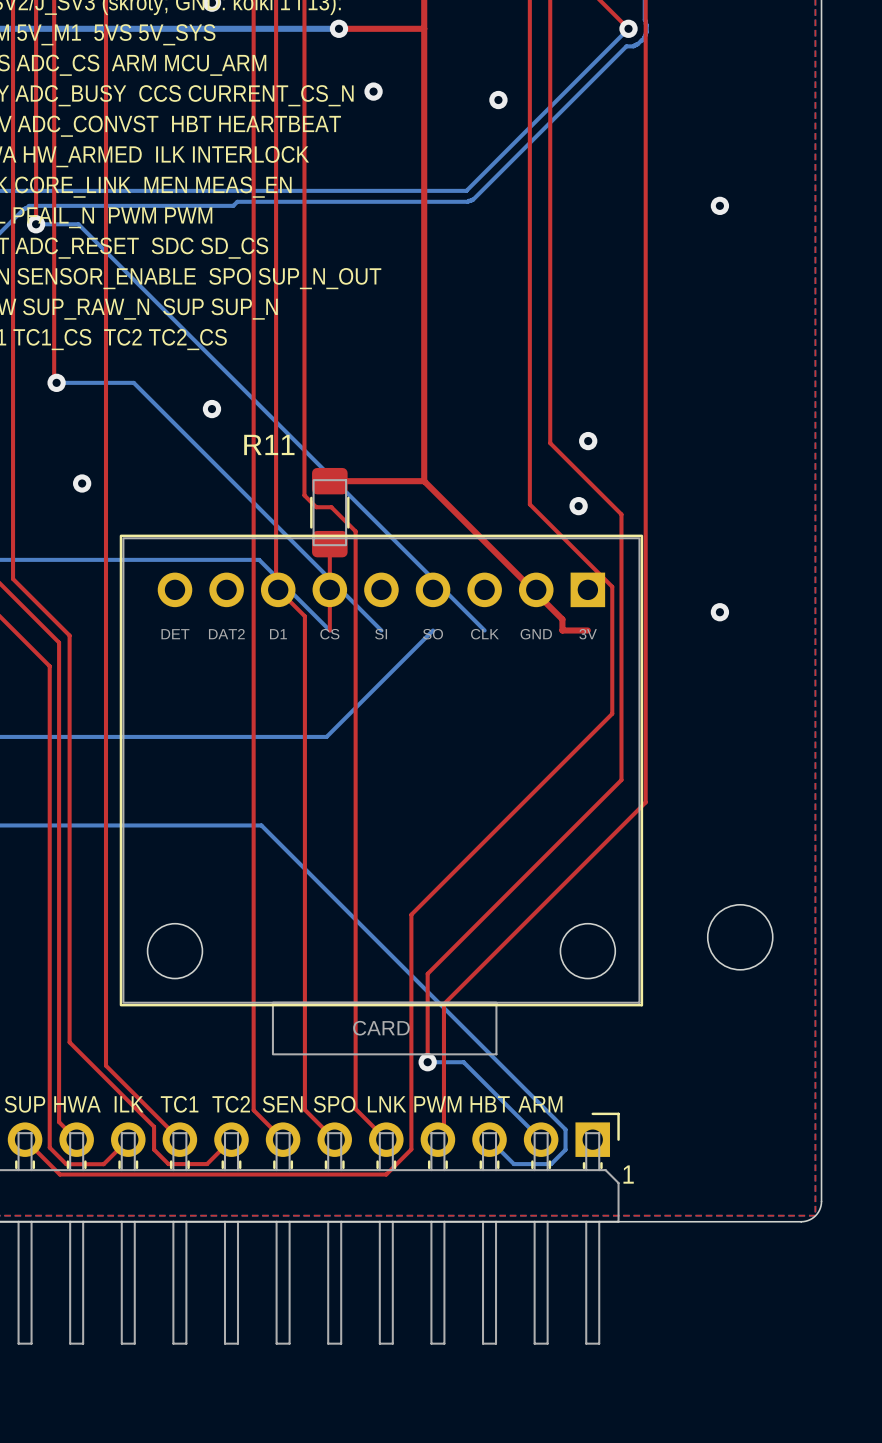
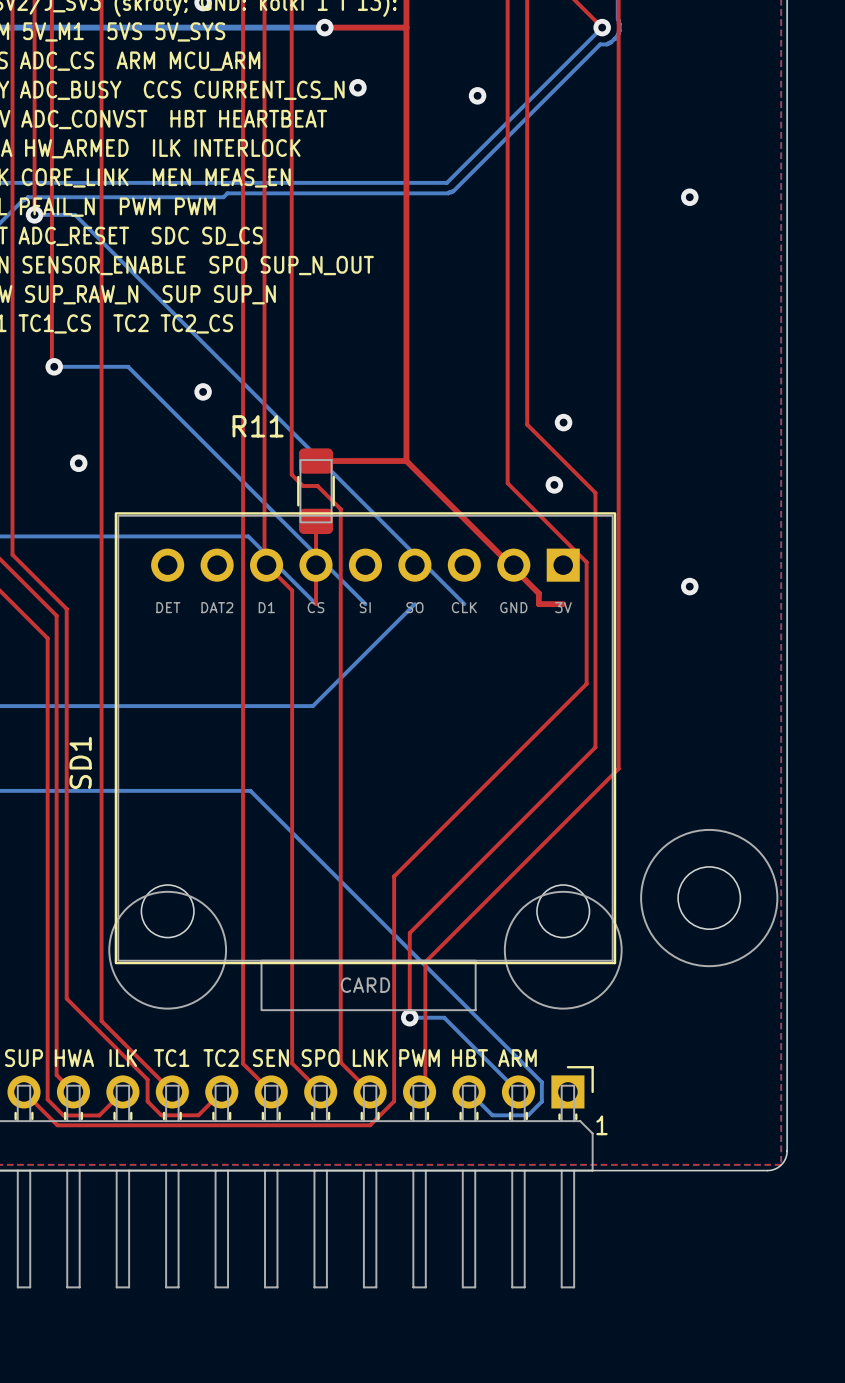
SD1 name: none -> SD1 (80, 762)
drawing: none -> [503, 828, 779, 1010]
drawing: none -> [108, 890, 228, 1010]

